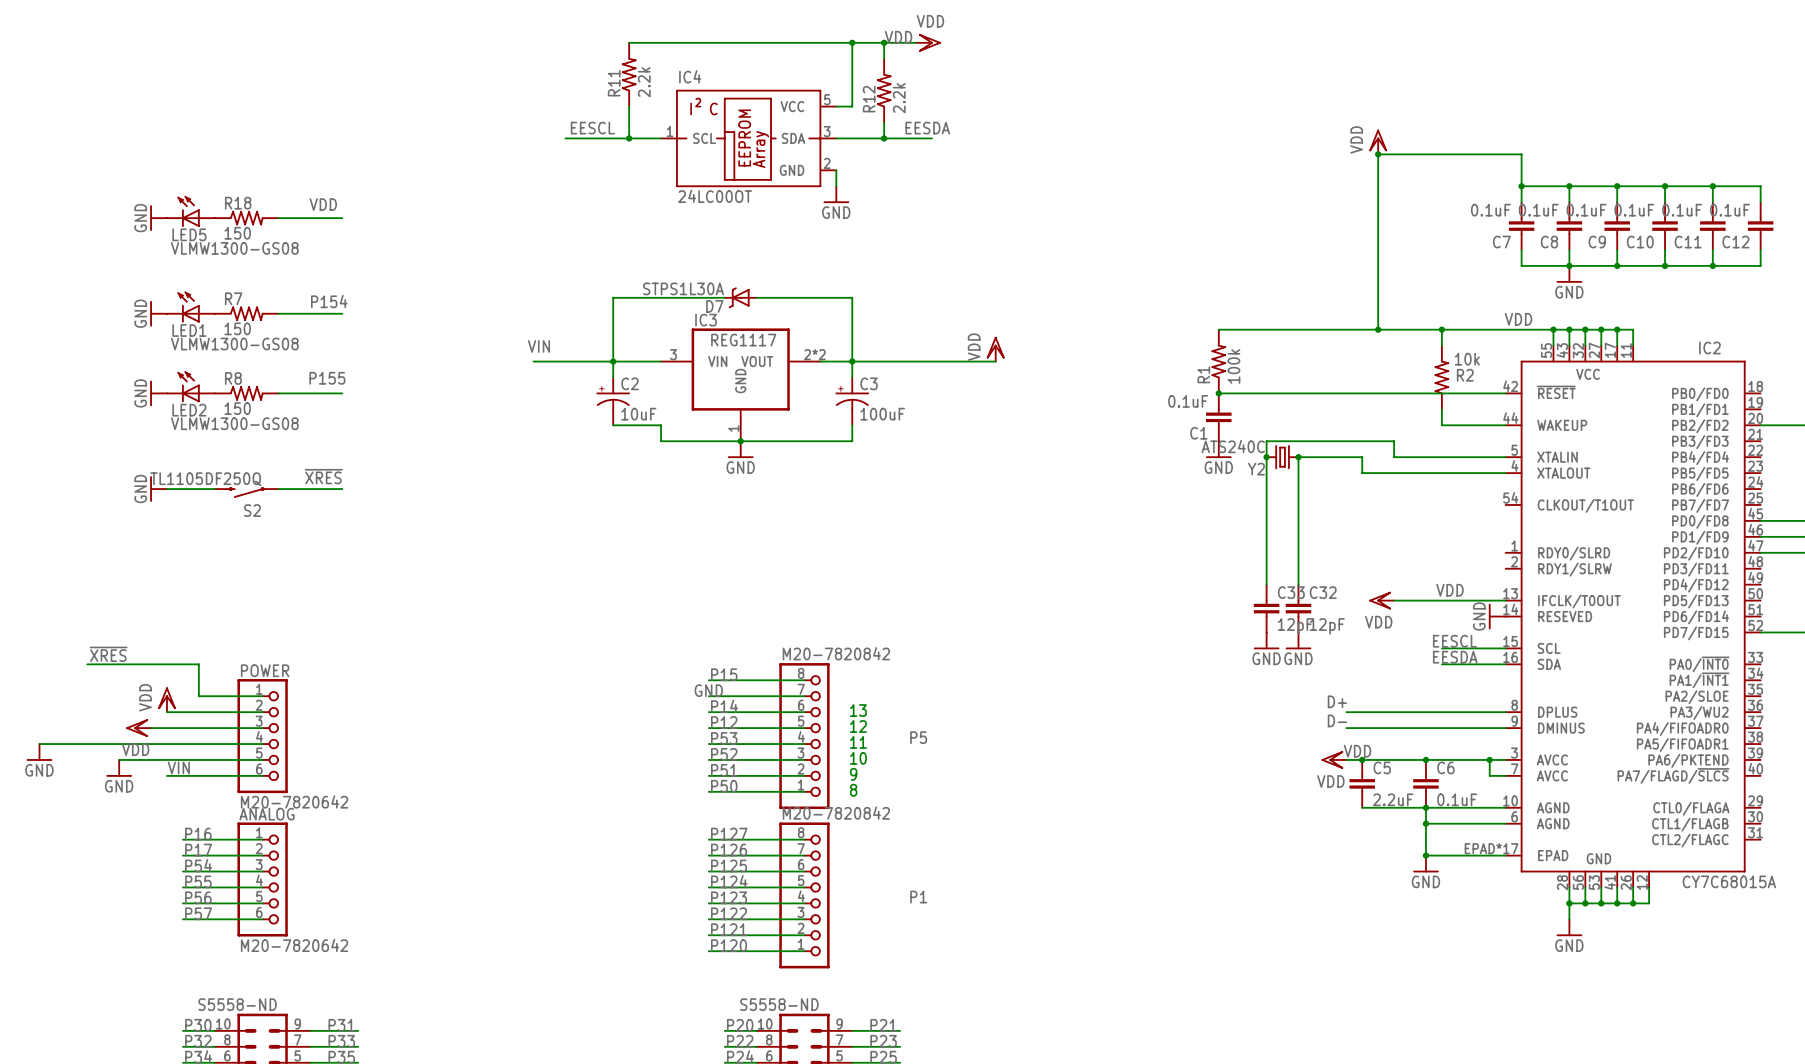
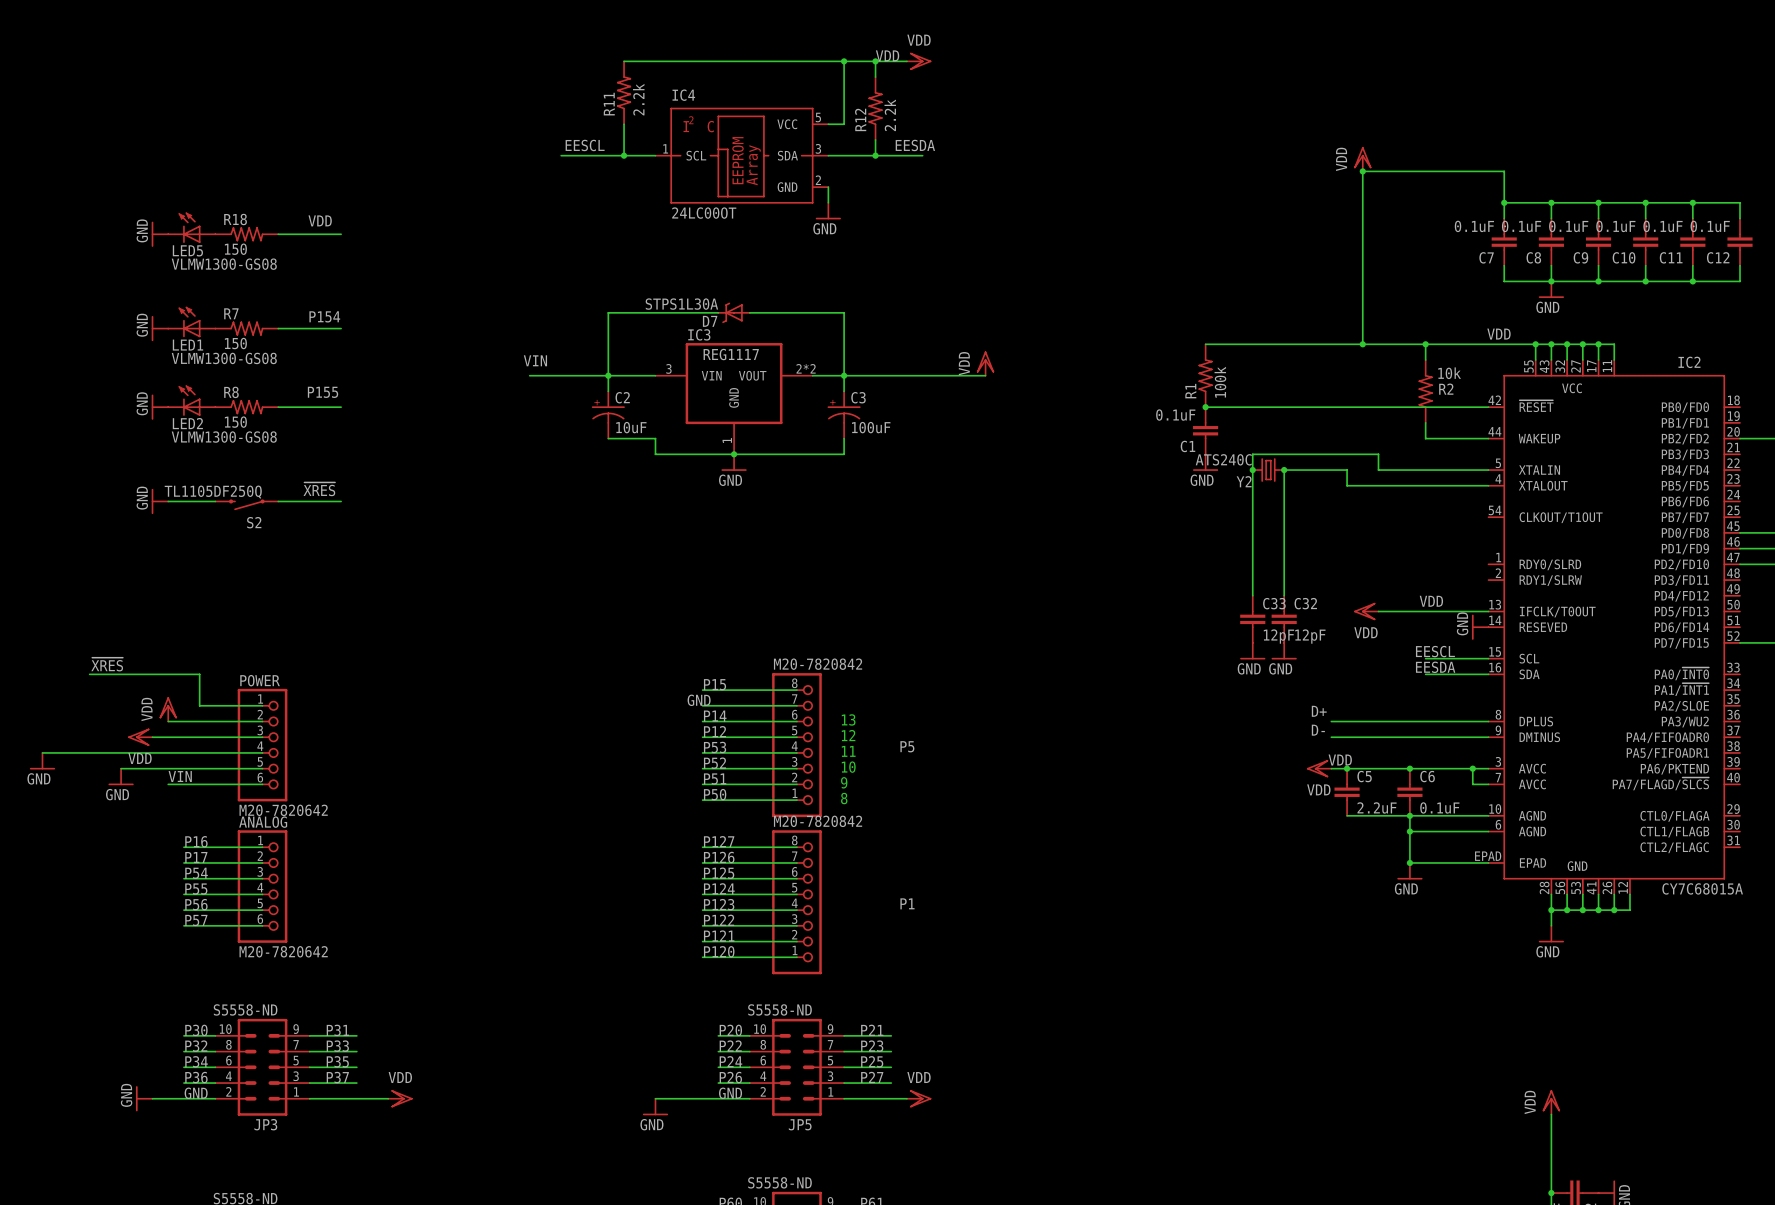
IC2 pin number: EPAD*17 (1491, 848) -> EPAD (1488, 856)

